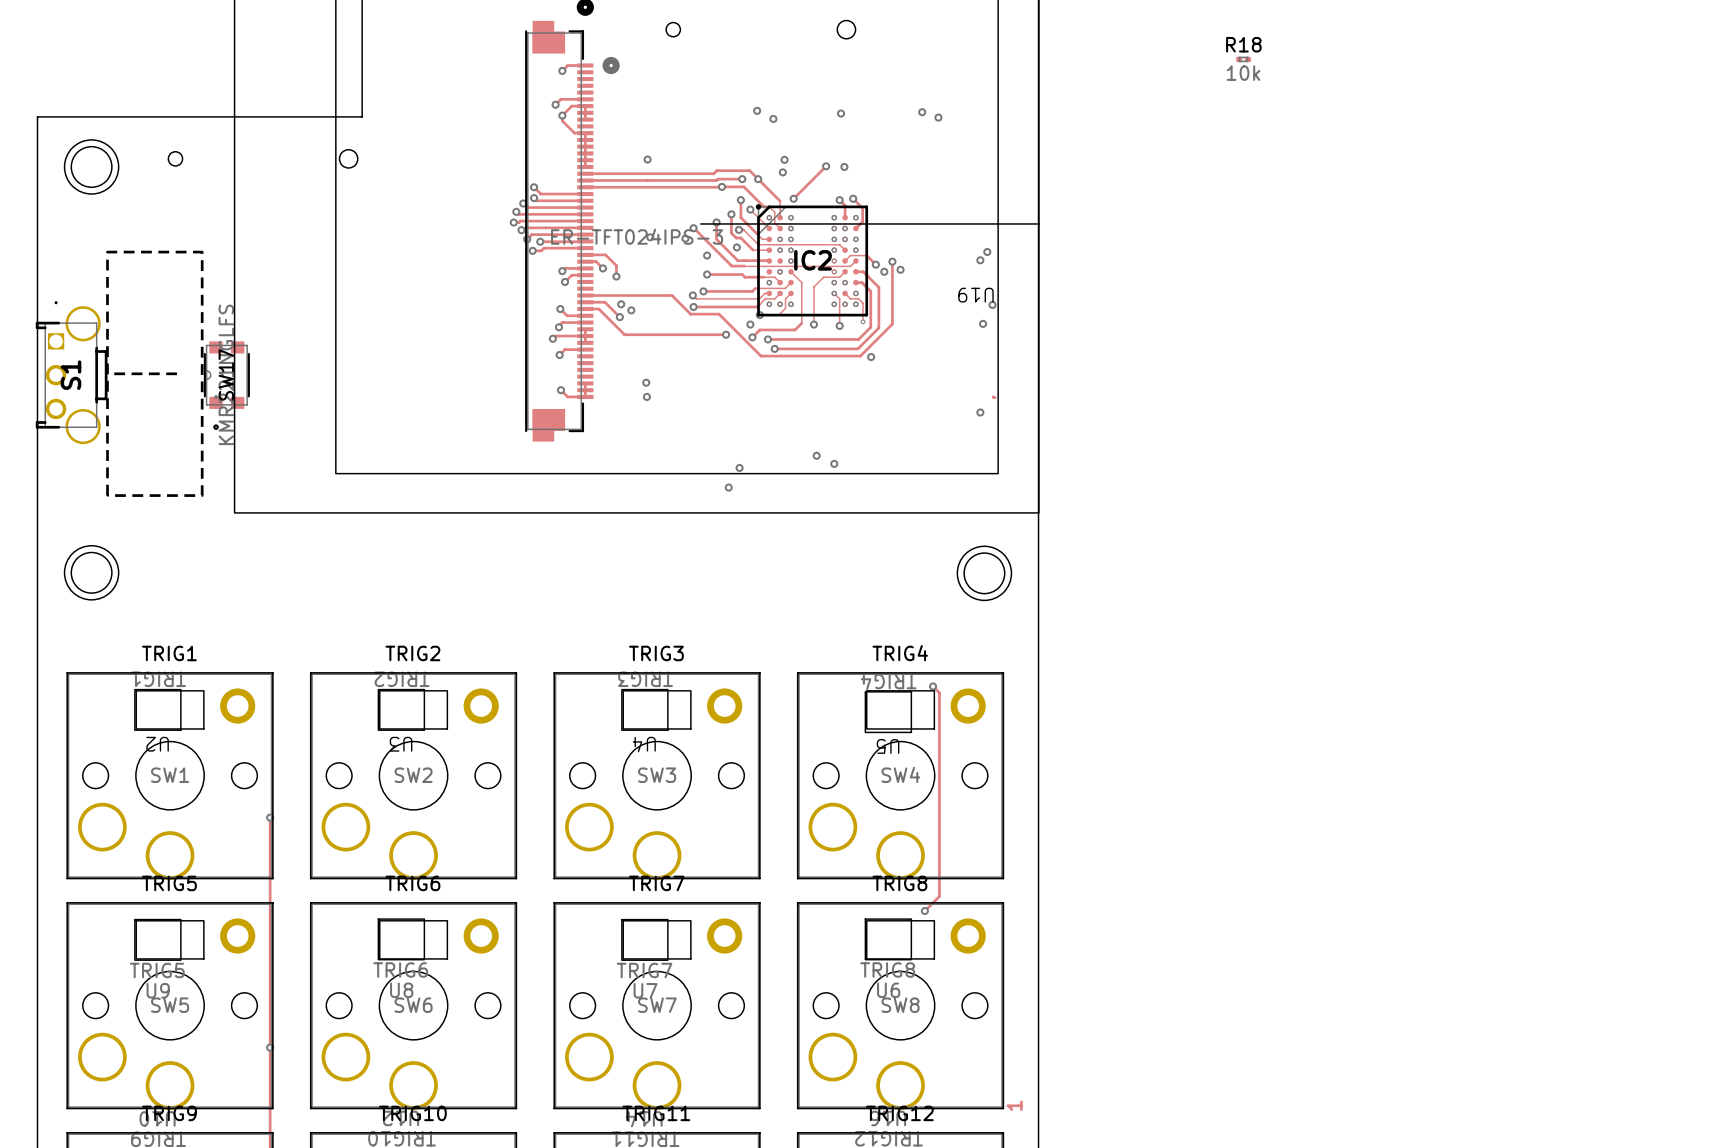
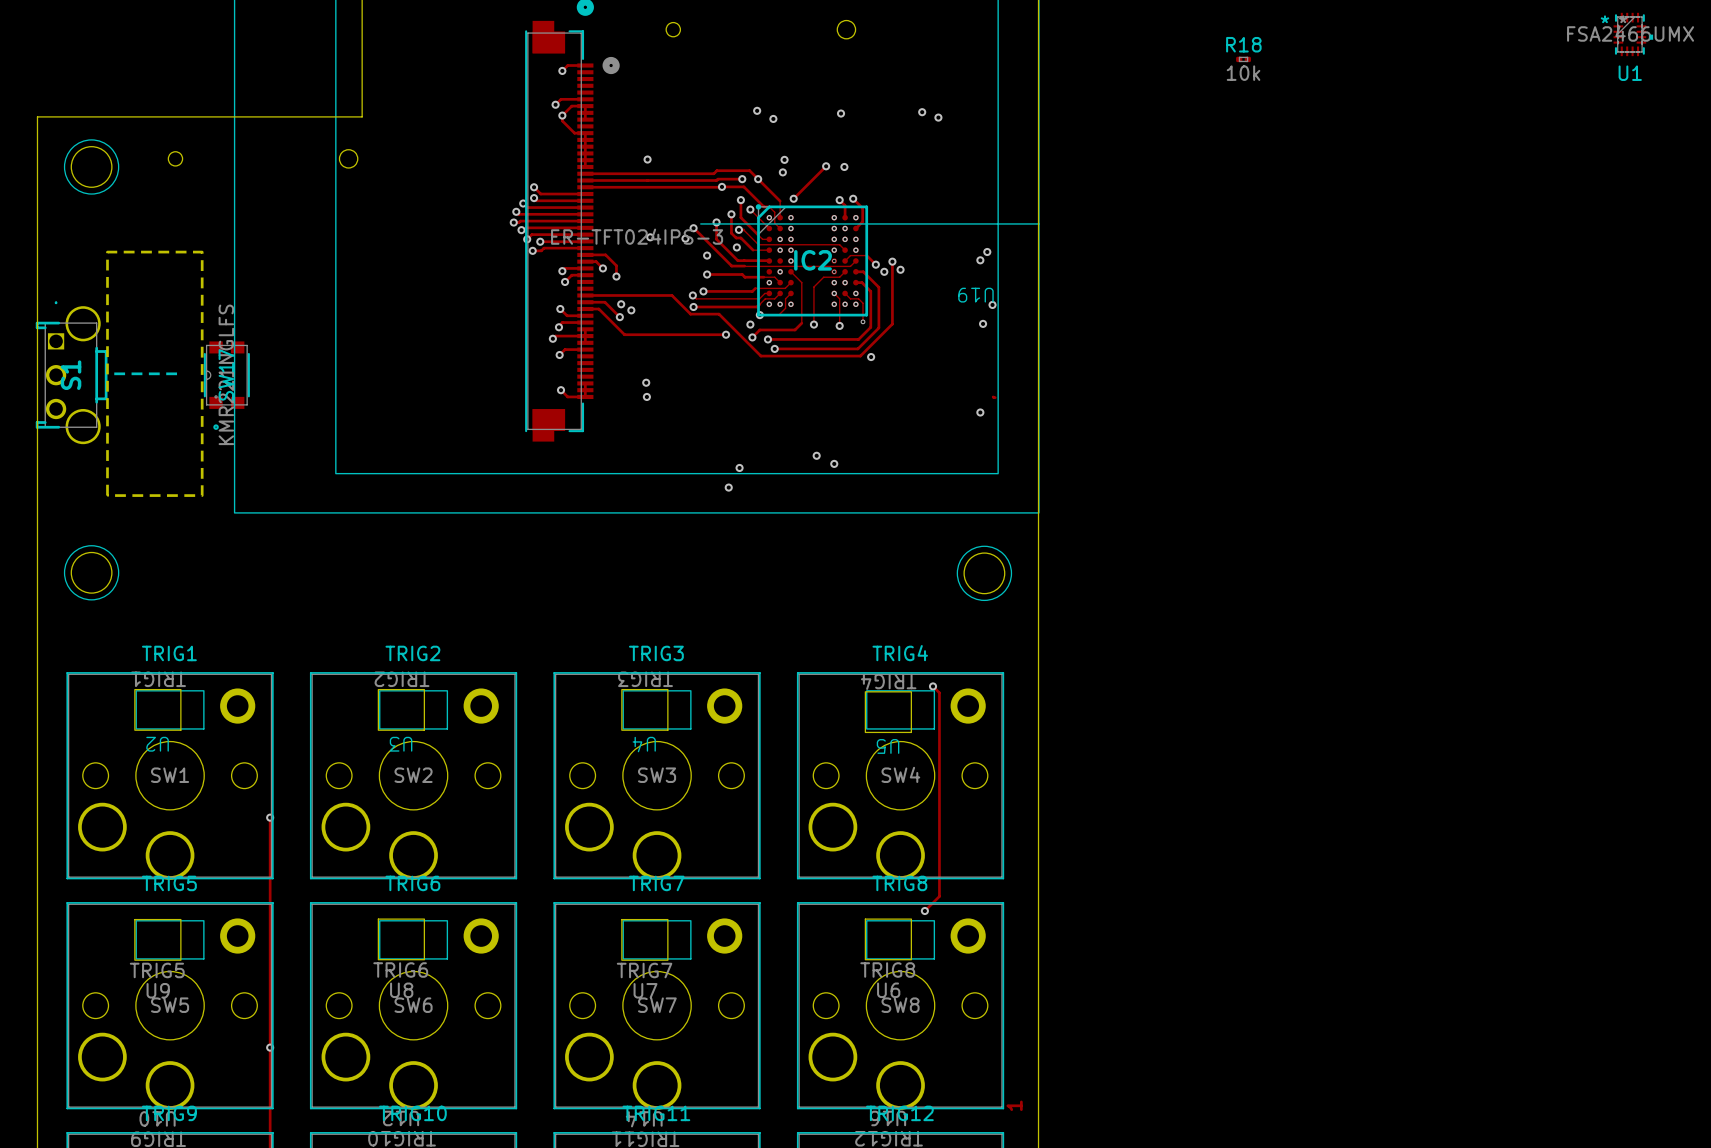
U1: none -> FSA2466UMX (1633, 34)

